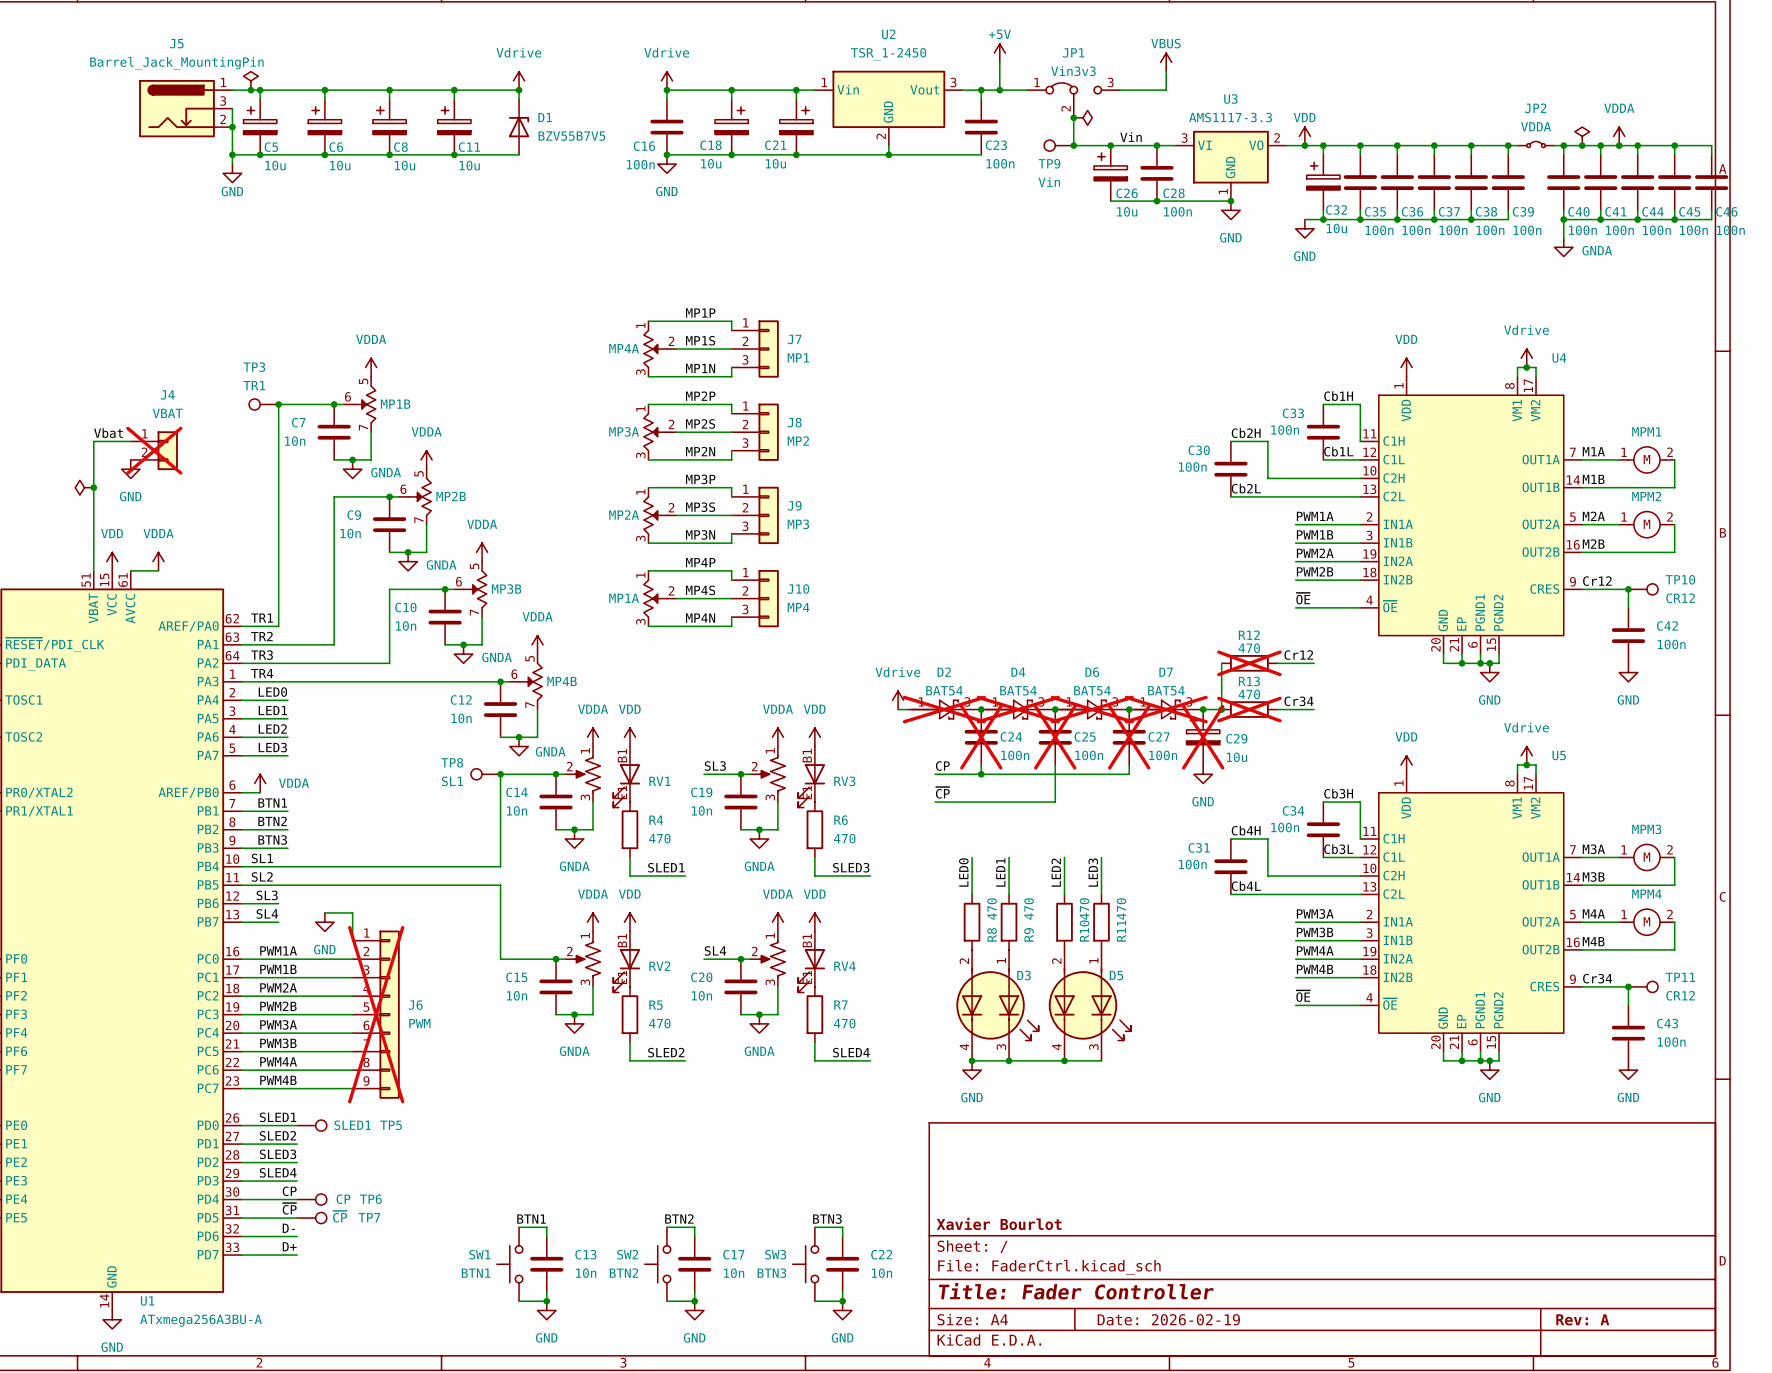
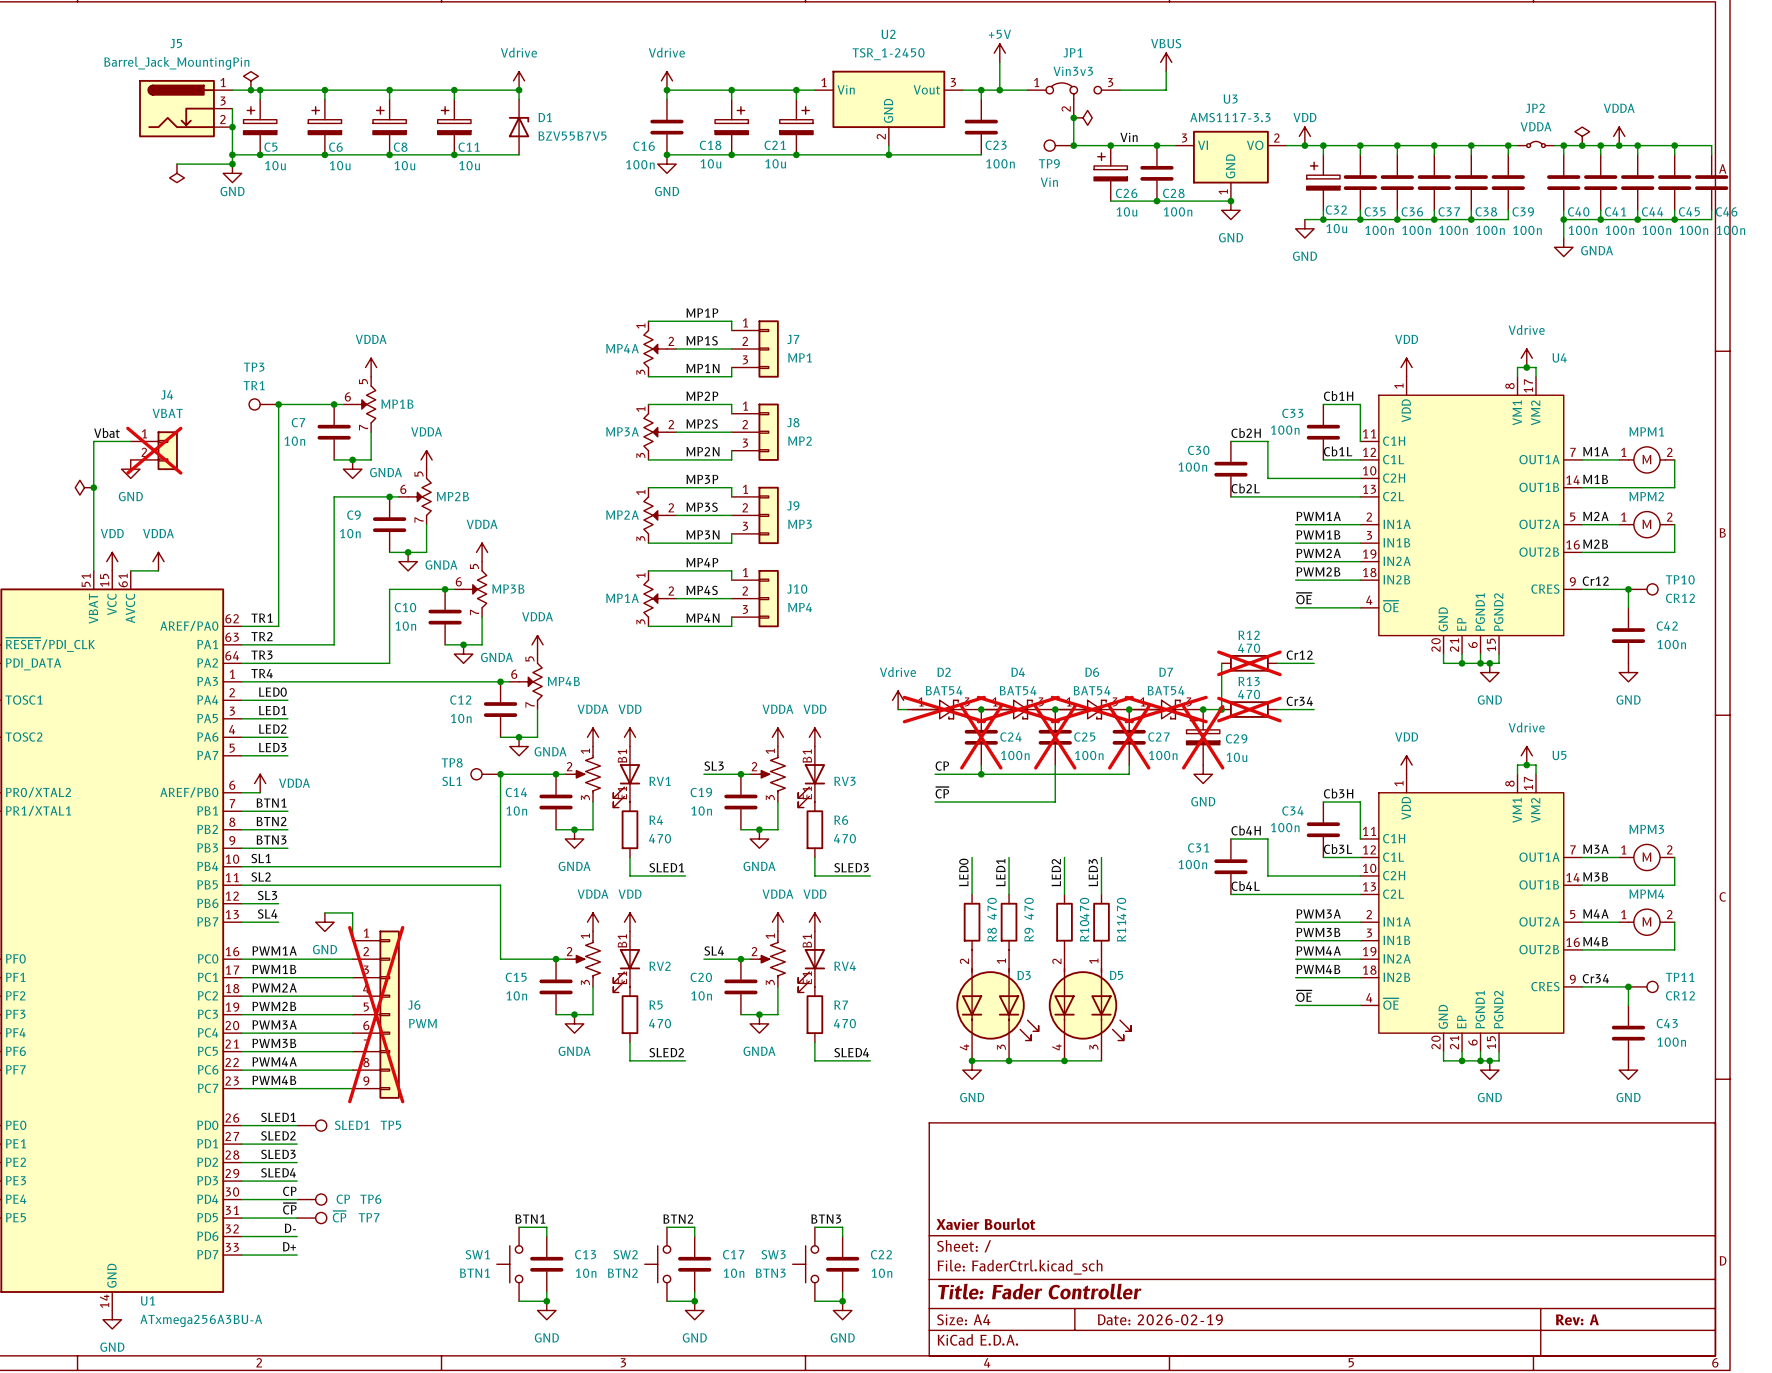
wire: none -> (176, 164) (232, 164)
junction: none -> (232, 164)
power symbol: none -> (176, 173)

